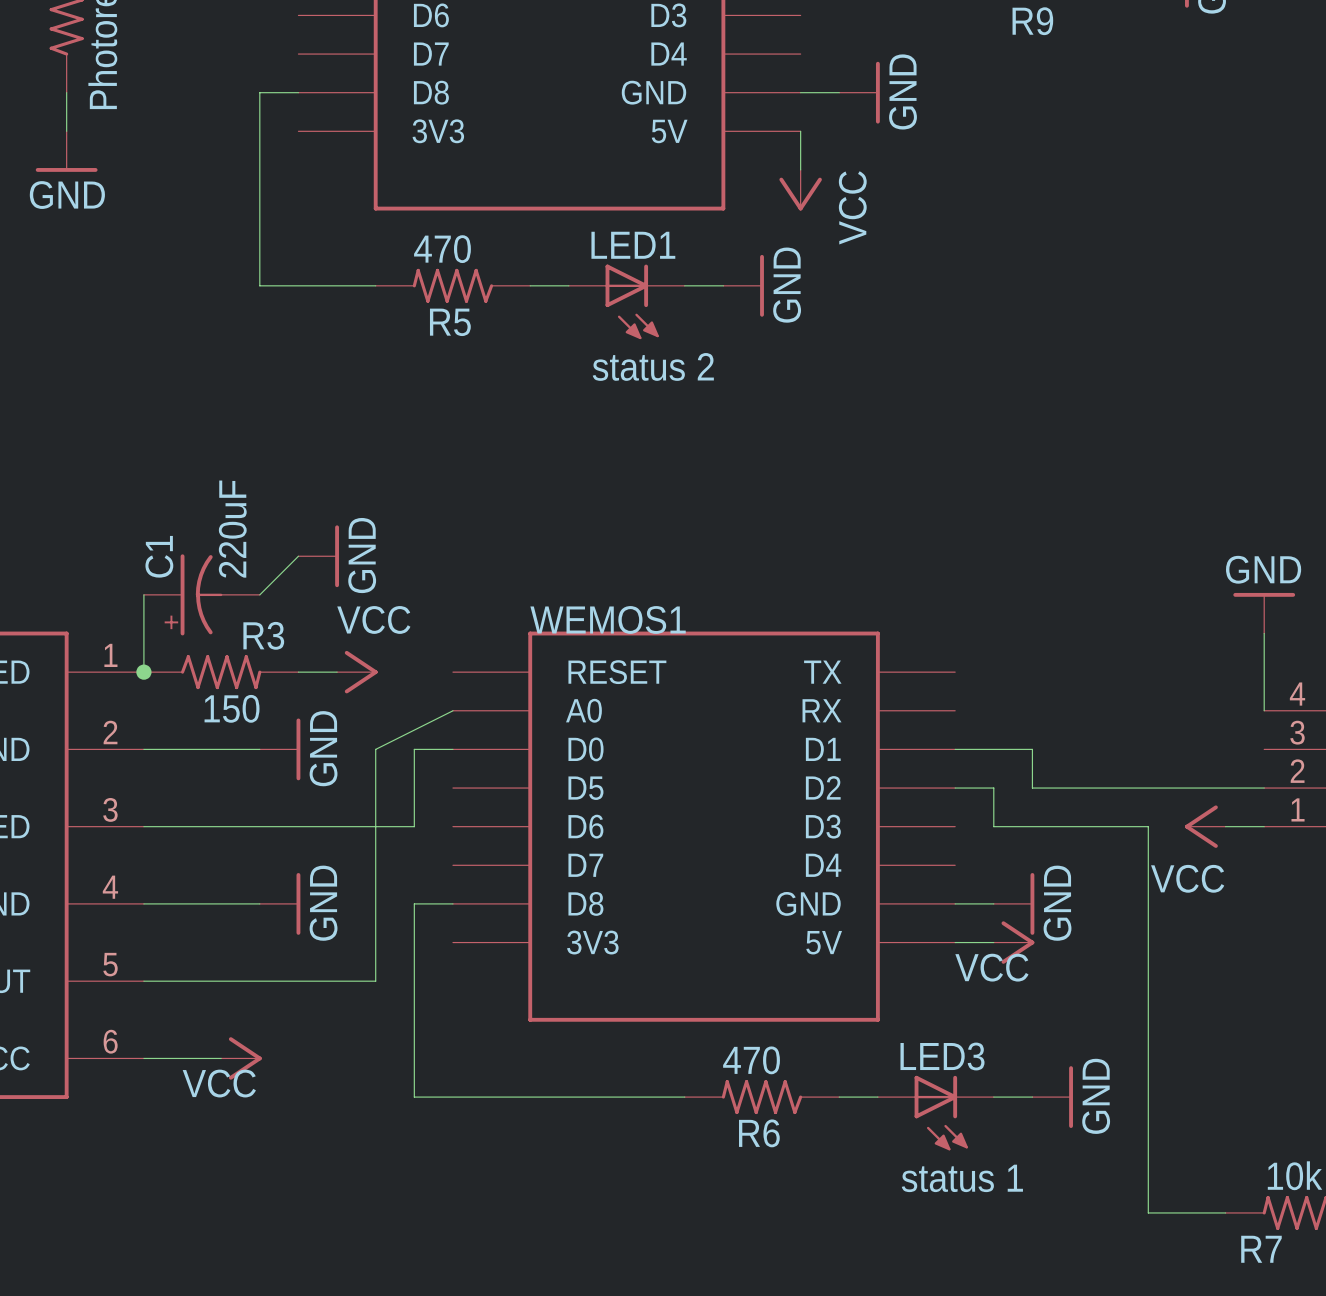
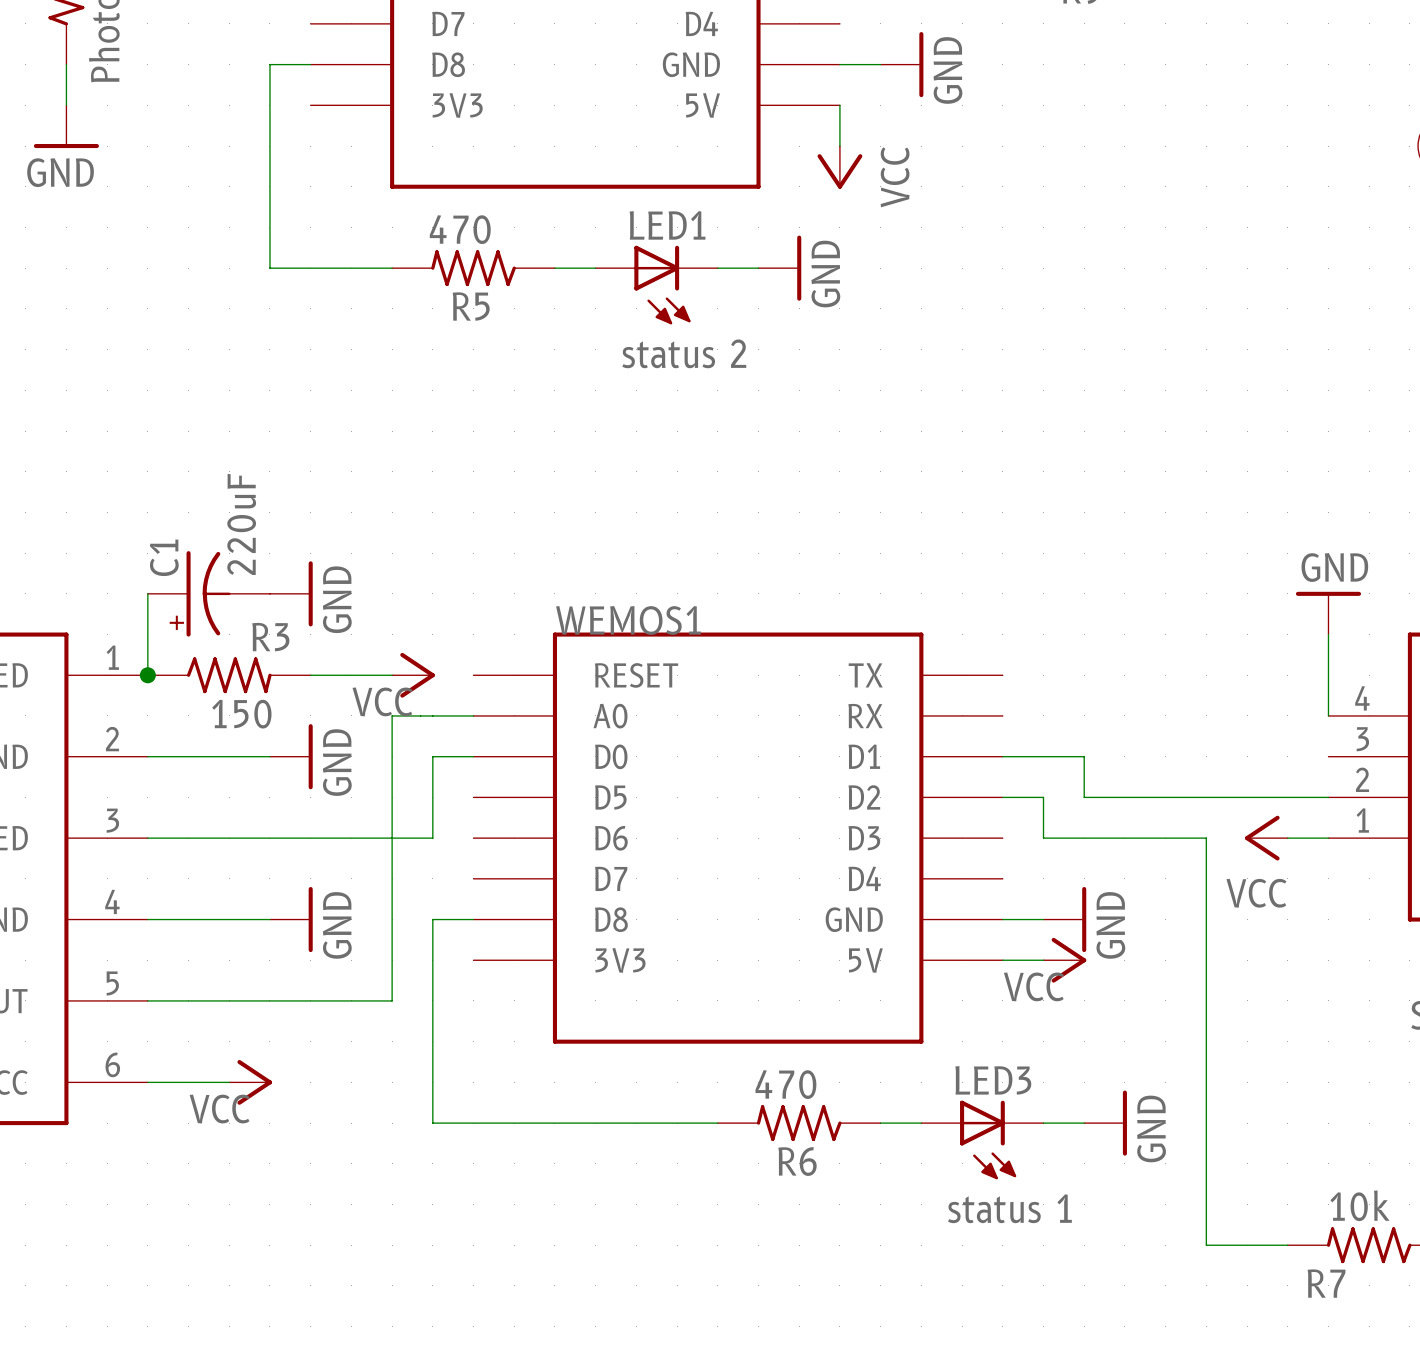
wire: (298, 556) (259, 594) -> none
power symbol position: GND (318, 556) -> GND (291, 593)
power symbol text position: VCC (373, 619) -> VCC (382, 701)
power symbol position: VCC (357, 672) -> VCC (413, 675)
wire: (452, 710) (375, 749) -> (473, 715) (392, 715) (392, 756)

